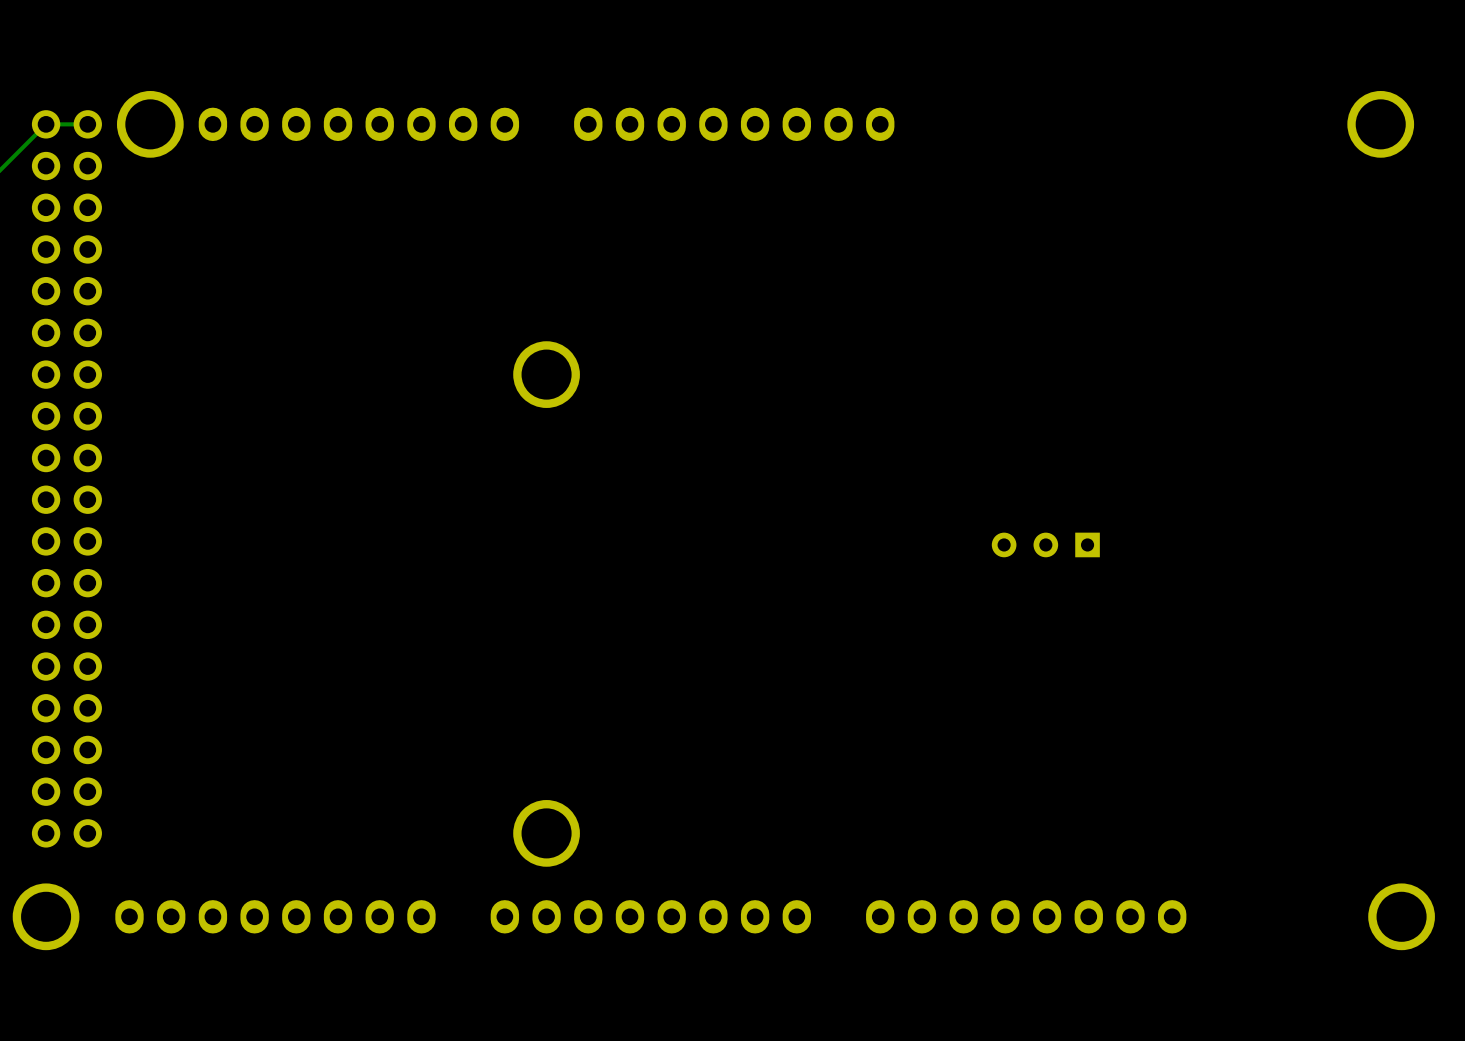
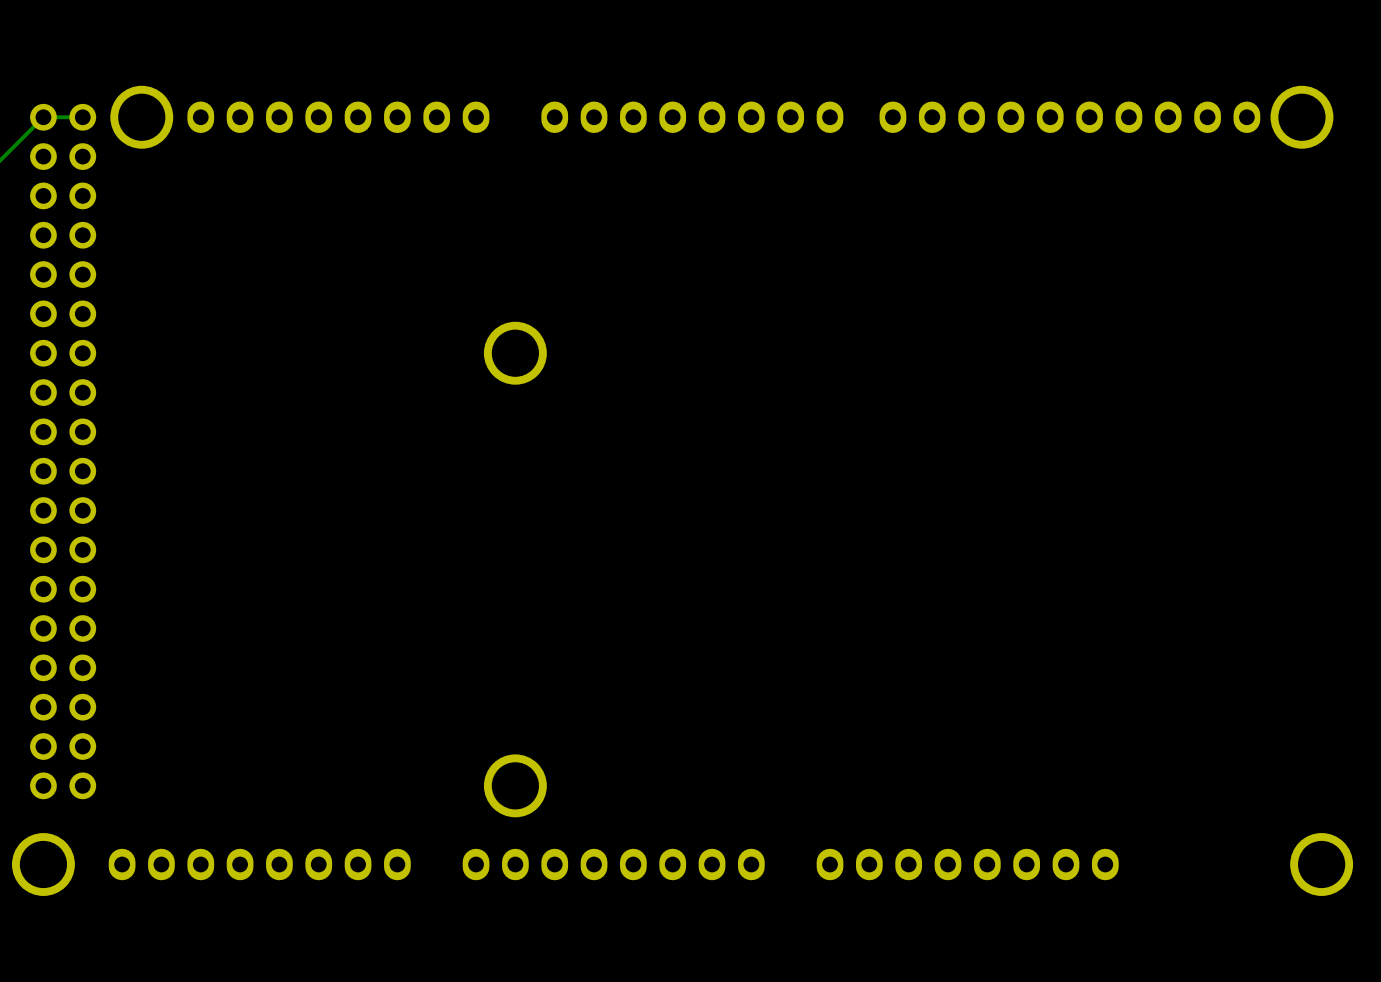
part: none -> (1069, 117)
part: (1045, 544) -> none

